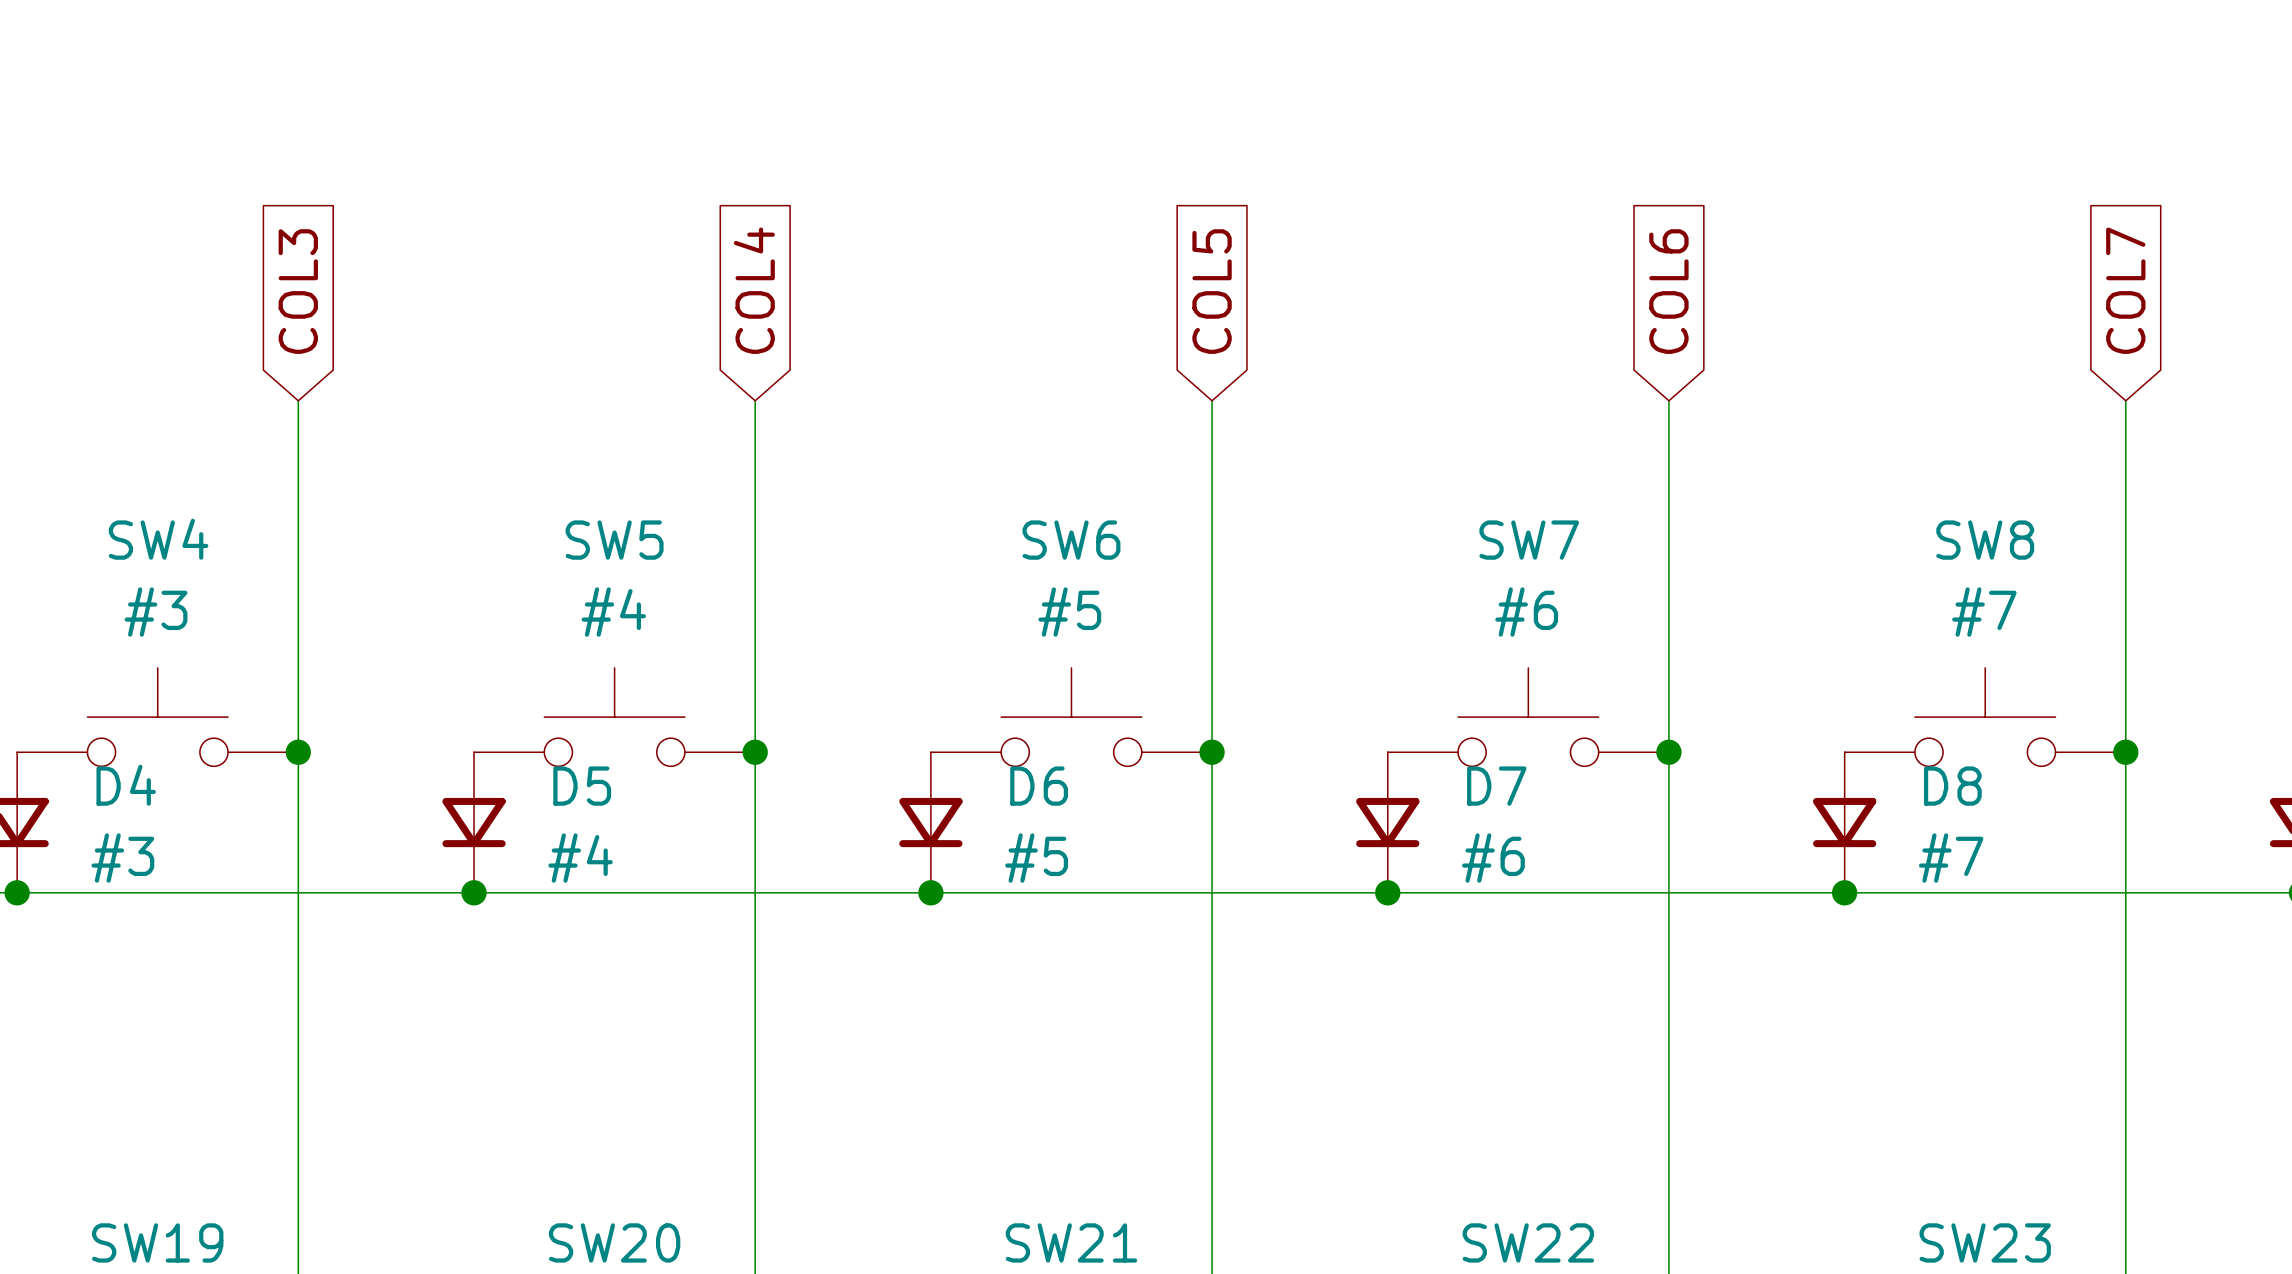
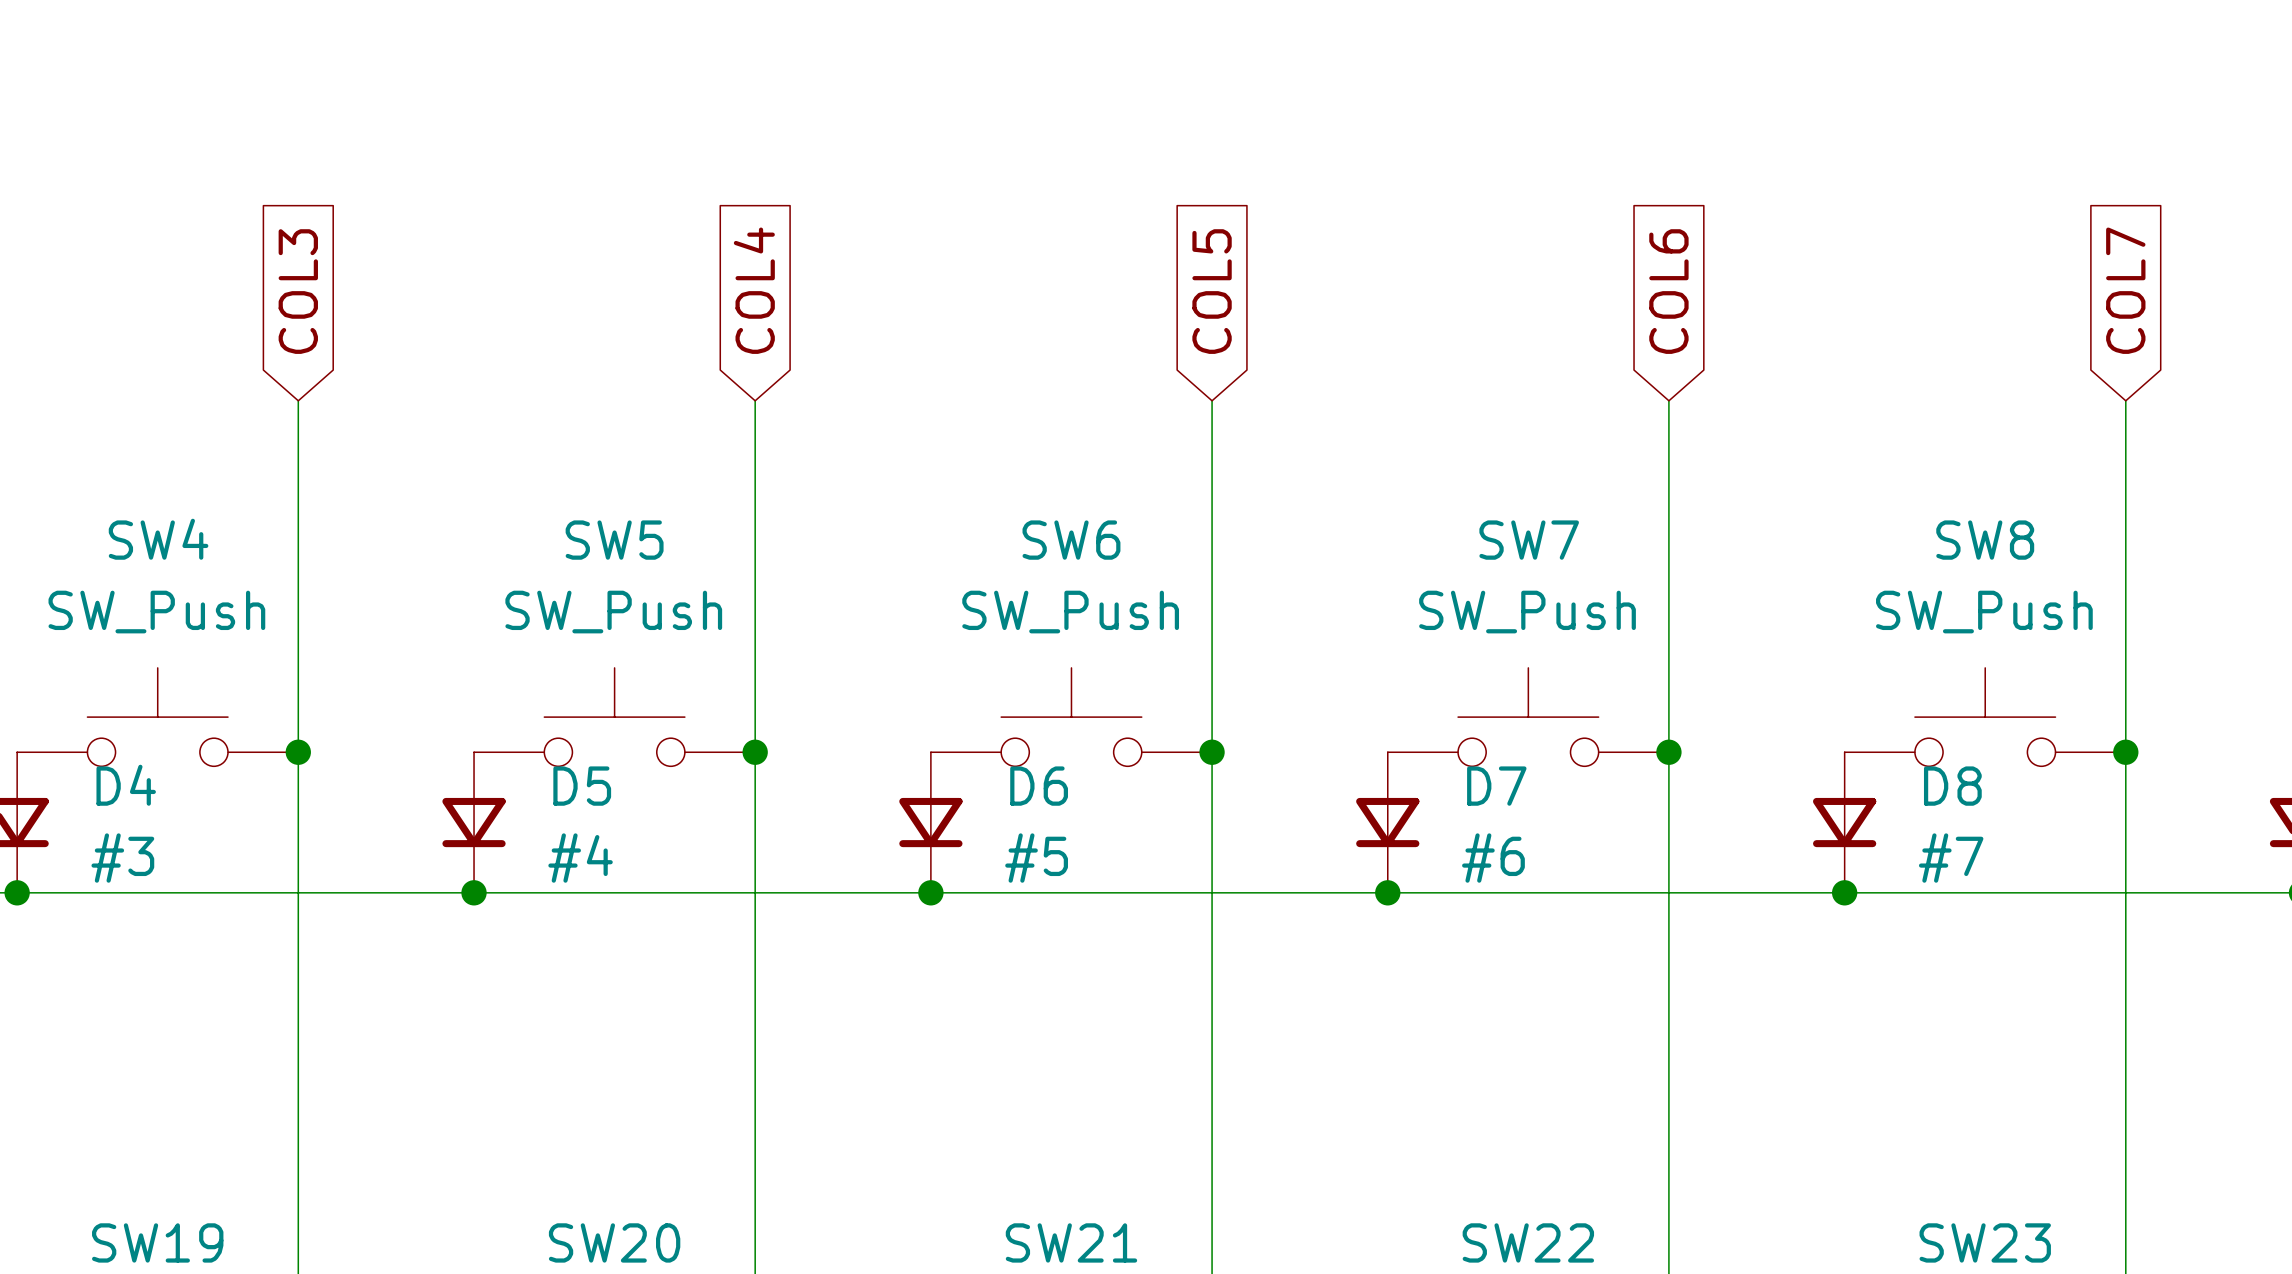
SW4 value: #3 (156, 612) -> SW_Push (156, 612)
SW5 value: #4 (613, 612) -> SW_Push (613, 612)
SW6 value: #5 (1069, 612) -> SW_Push (1070, 612)
SW7 value: #6 (1526, 612) -> SW_Push (1527, 612)
SW8 value: #7 (1984, 612) -> SW_Push (1984, 612)

